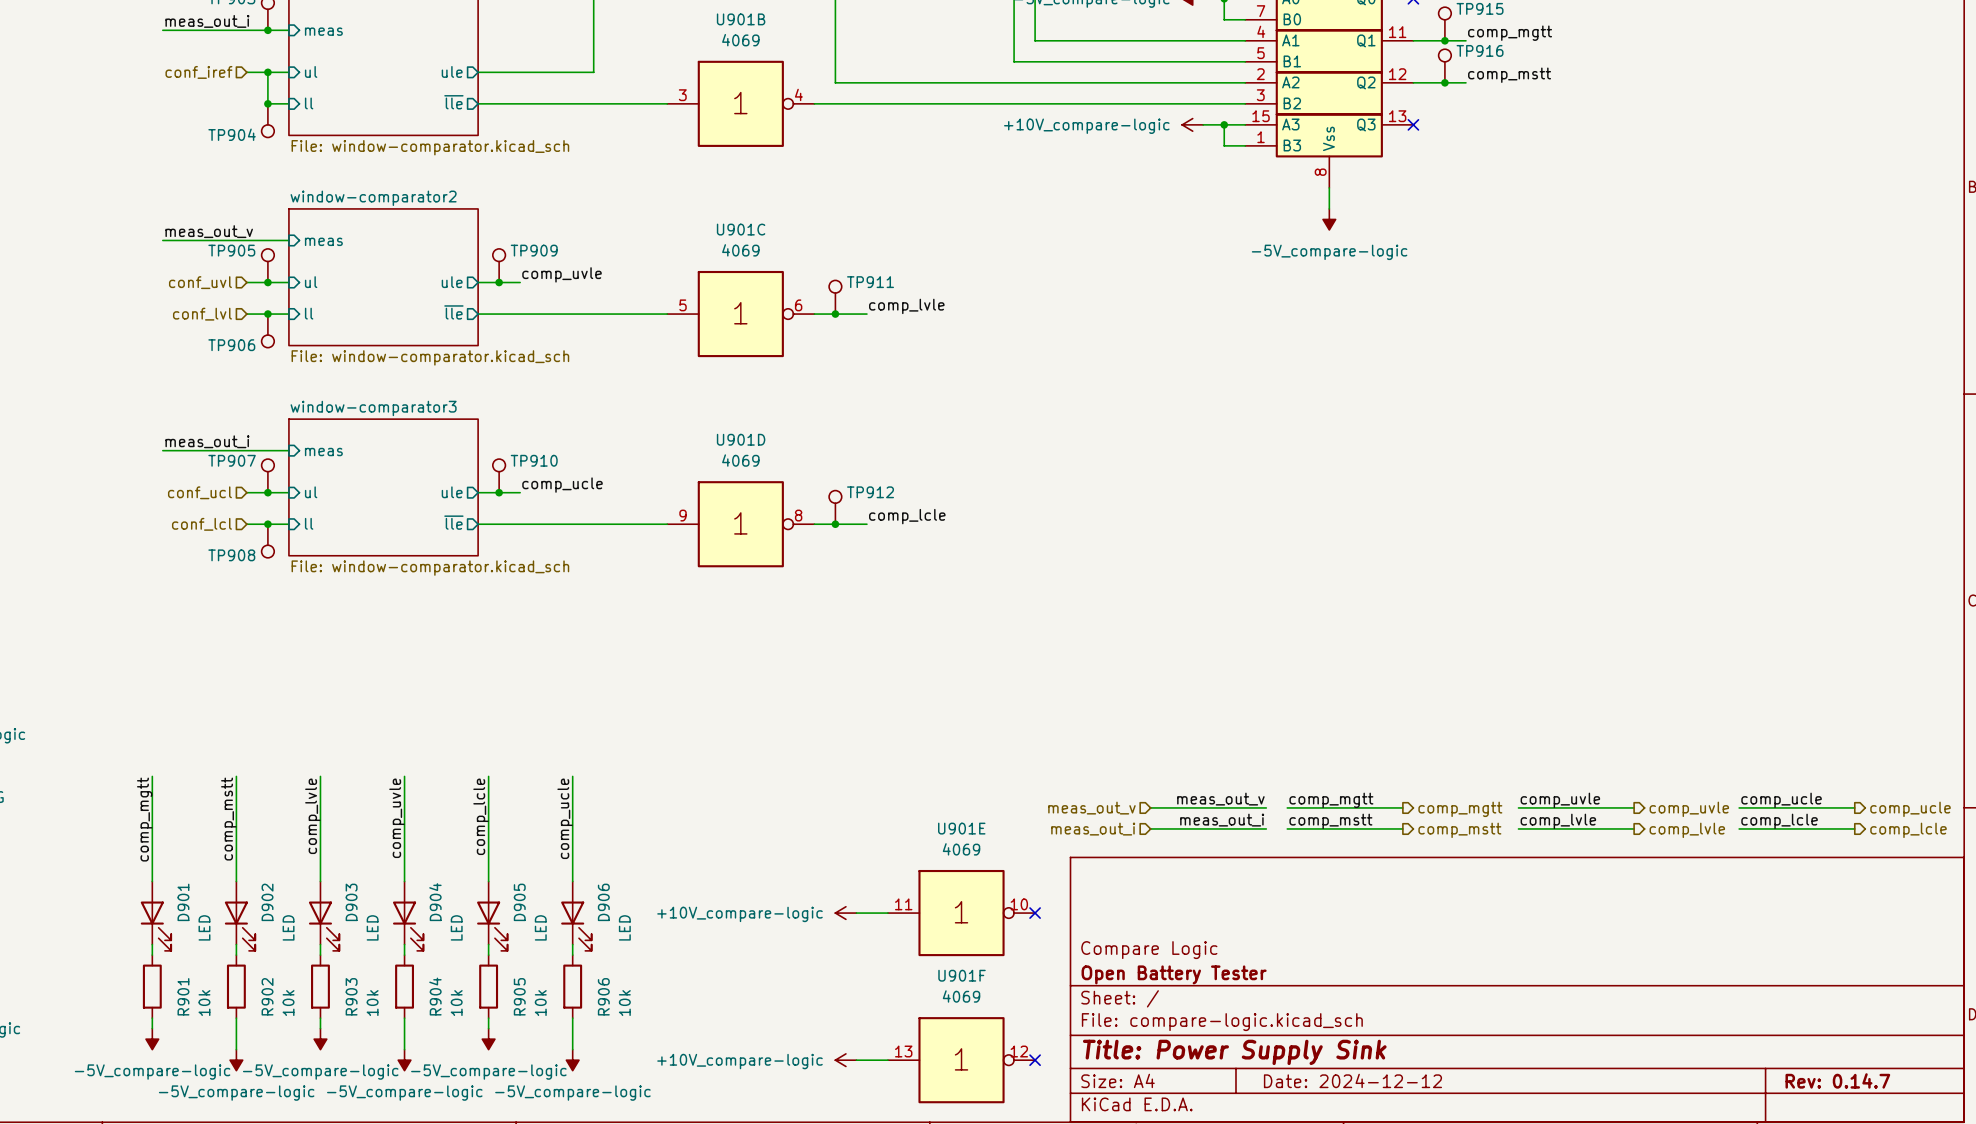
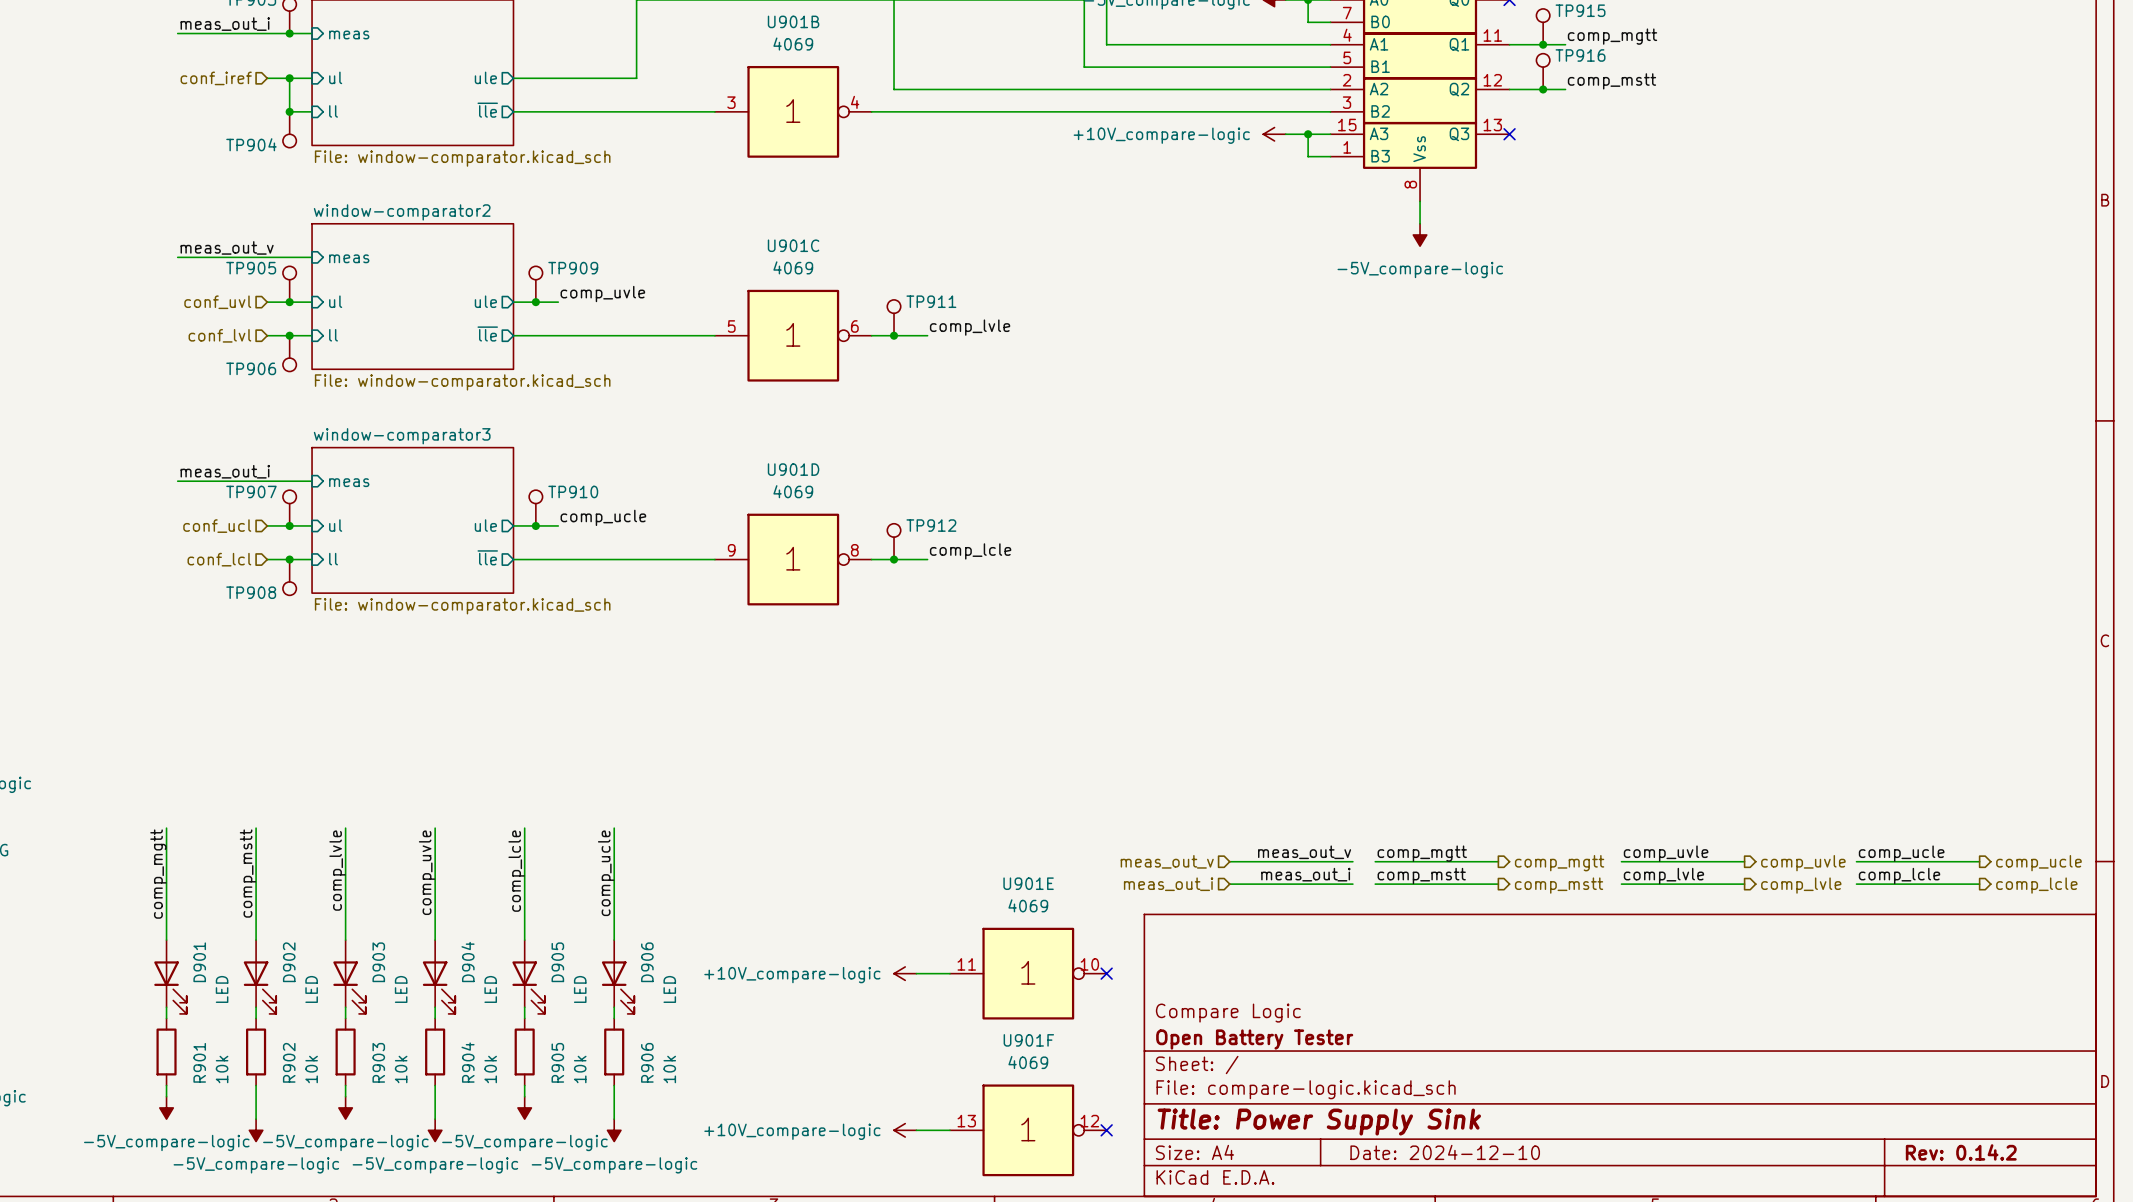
title block: Date: 2024-12-12 (1352, 1080) -> Date: 2024-12-10 (1445, 1152)
title block: Rev: 0.14.7 (1837, 1080) -> Rev: 0.14.2 (1961, 1152)

